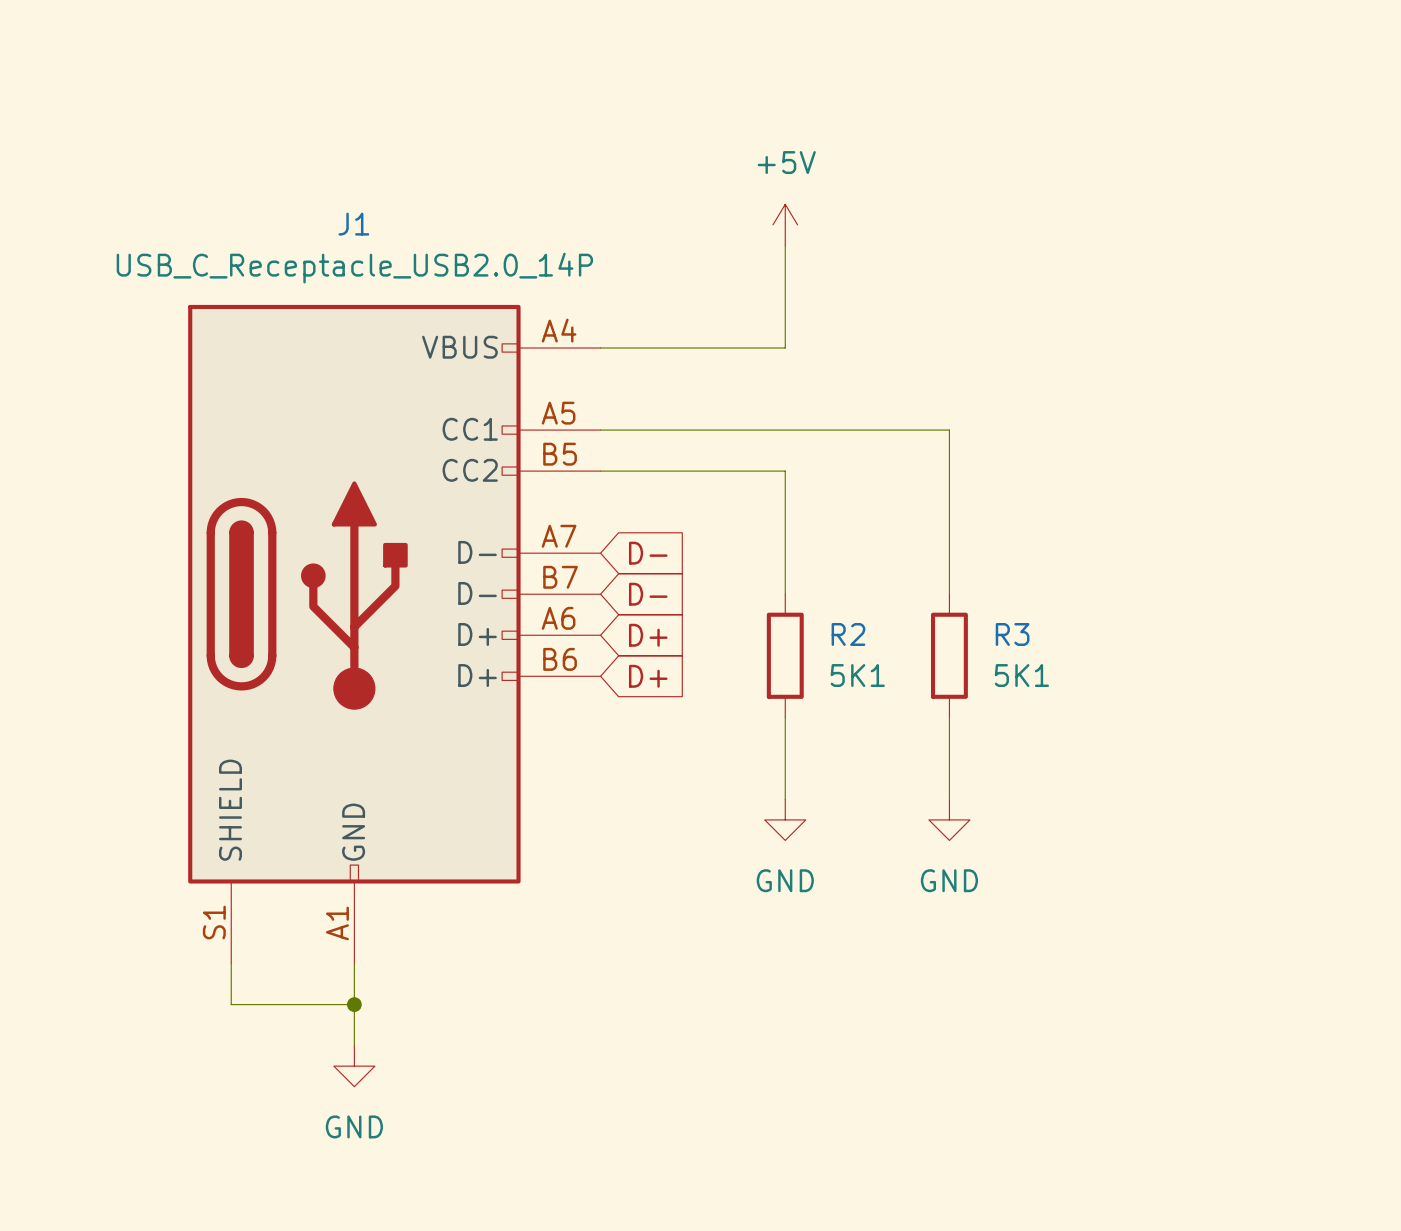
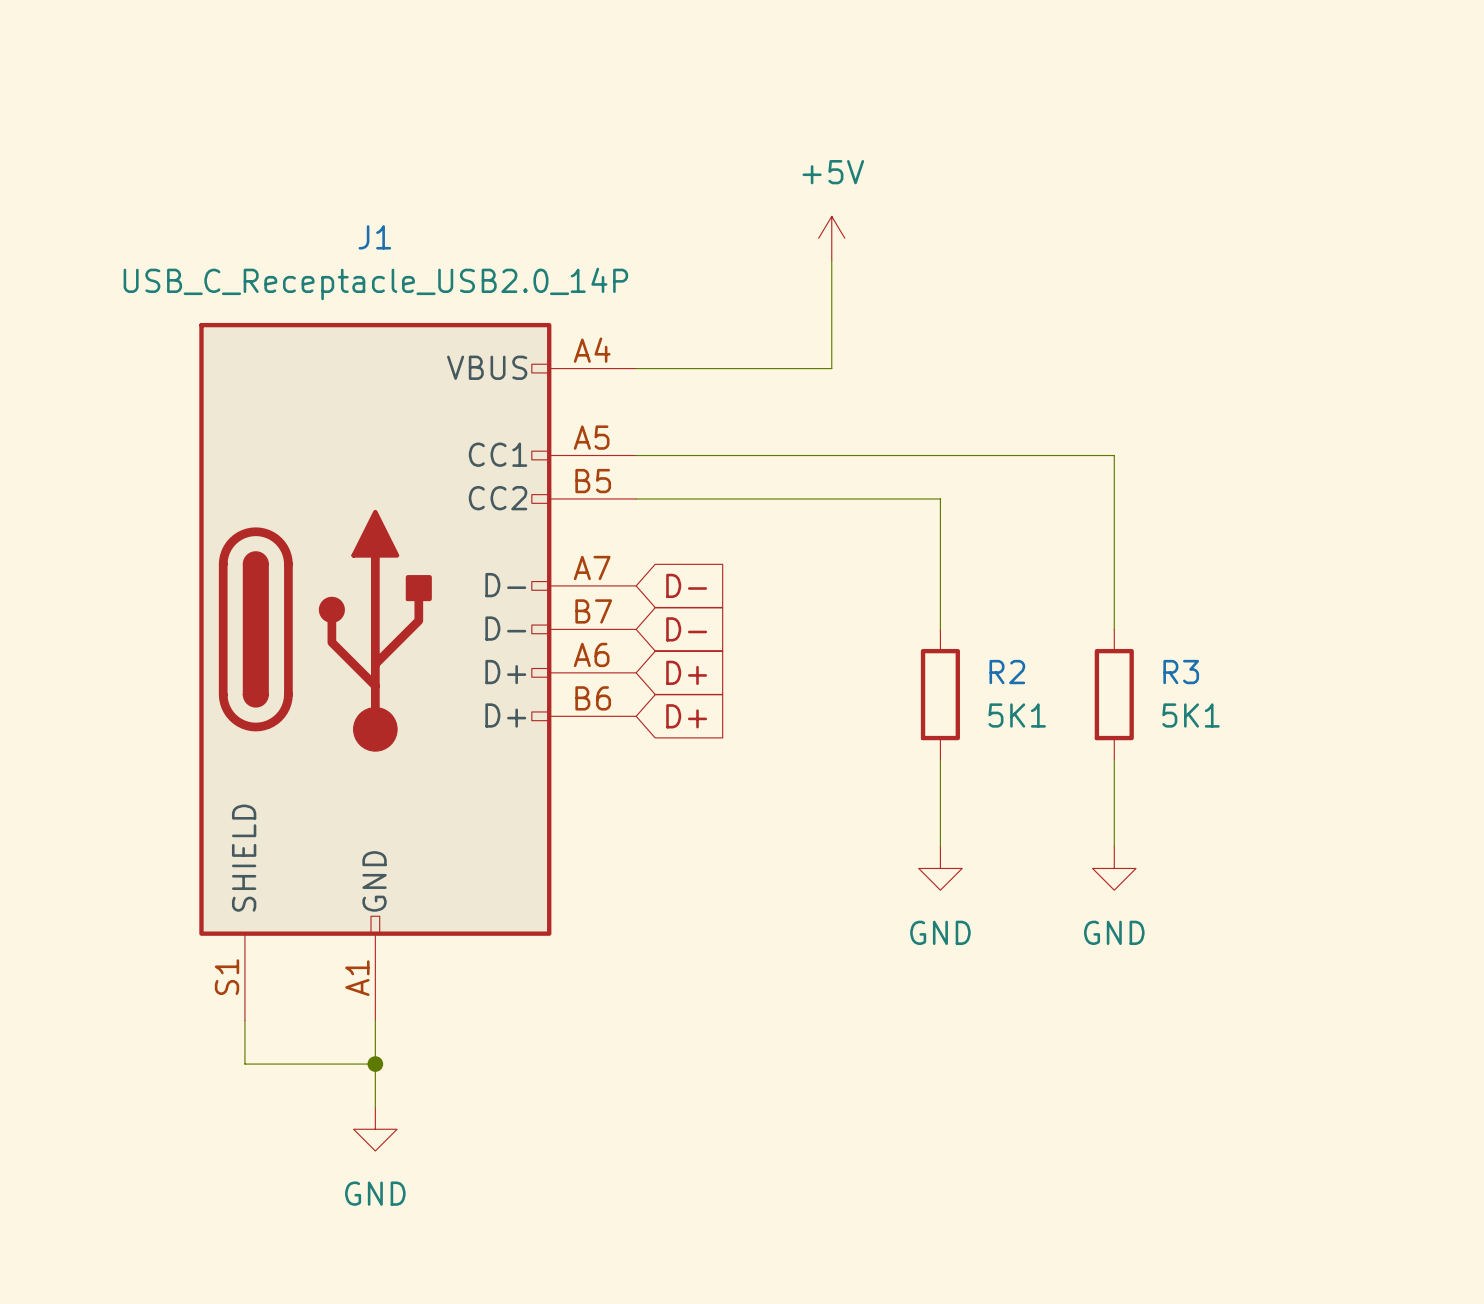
wire: (949, 430) (949, 594) -> (1005, 455) (1114, 455) (1114, 629)
wire: (785, 471) (785, 594) -> (831, 498) (940, 498) (940, 629)
R2 position: (785, 655) -> (940, 694)
R3 position: (949, 655) -> (1114, 694)
wire: (785, 717) (785, 799) -> (1114, 759) (1114, 846)
wire: (949, 717) (949, 799) -> (940, 759) (940, 846)
power symbol: GND (785, 819) -> none
power symbol: none -> GND (940, 868)
power symbol: GND (949, 819) -> none
power symbol: none -> GND (1114, 868)

